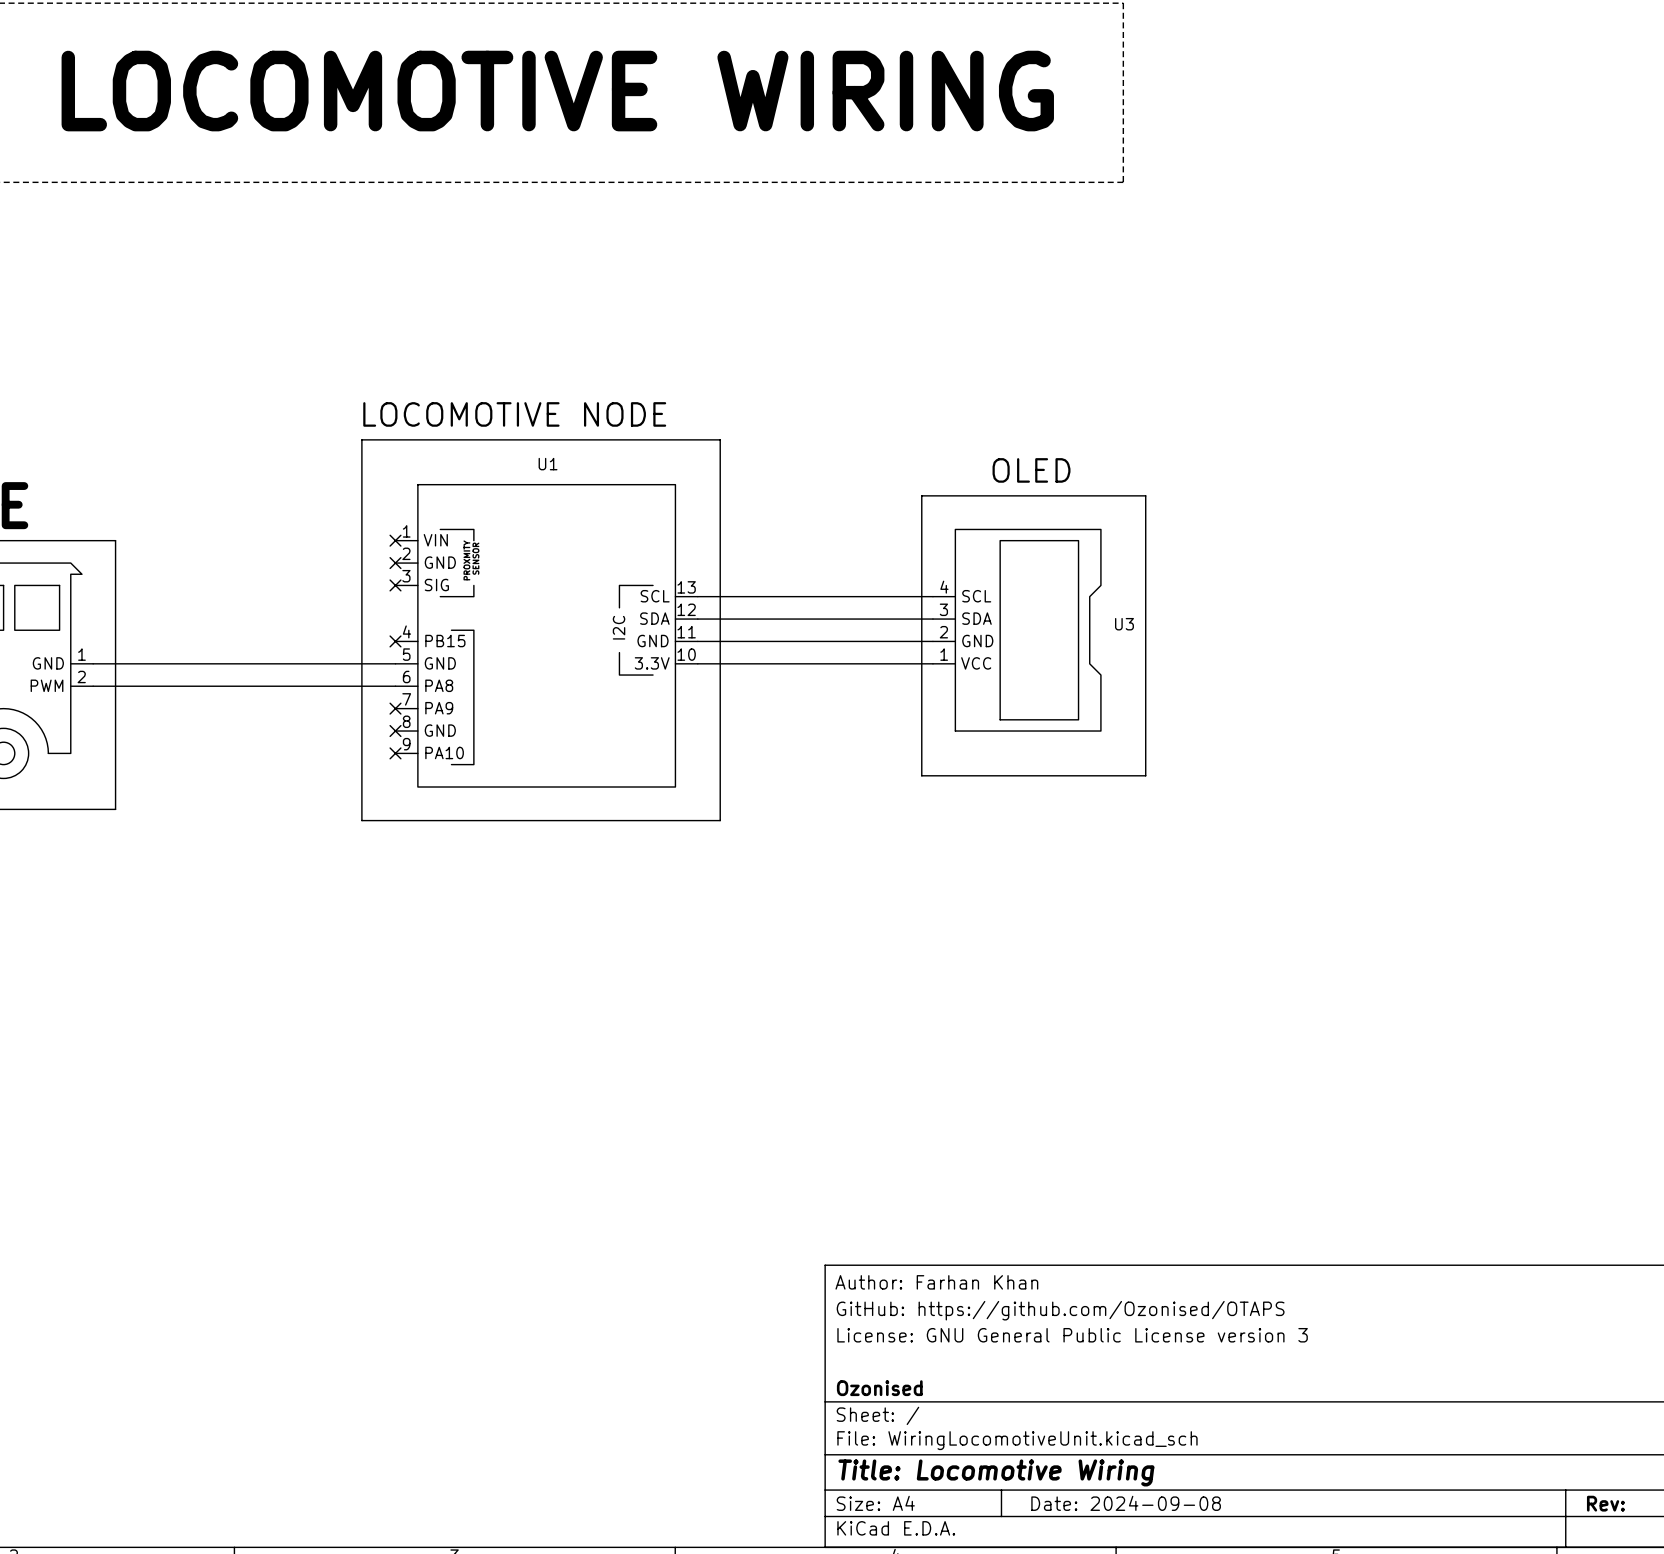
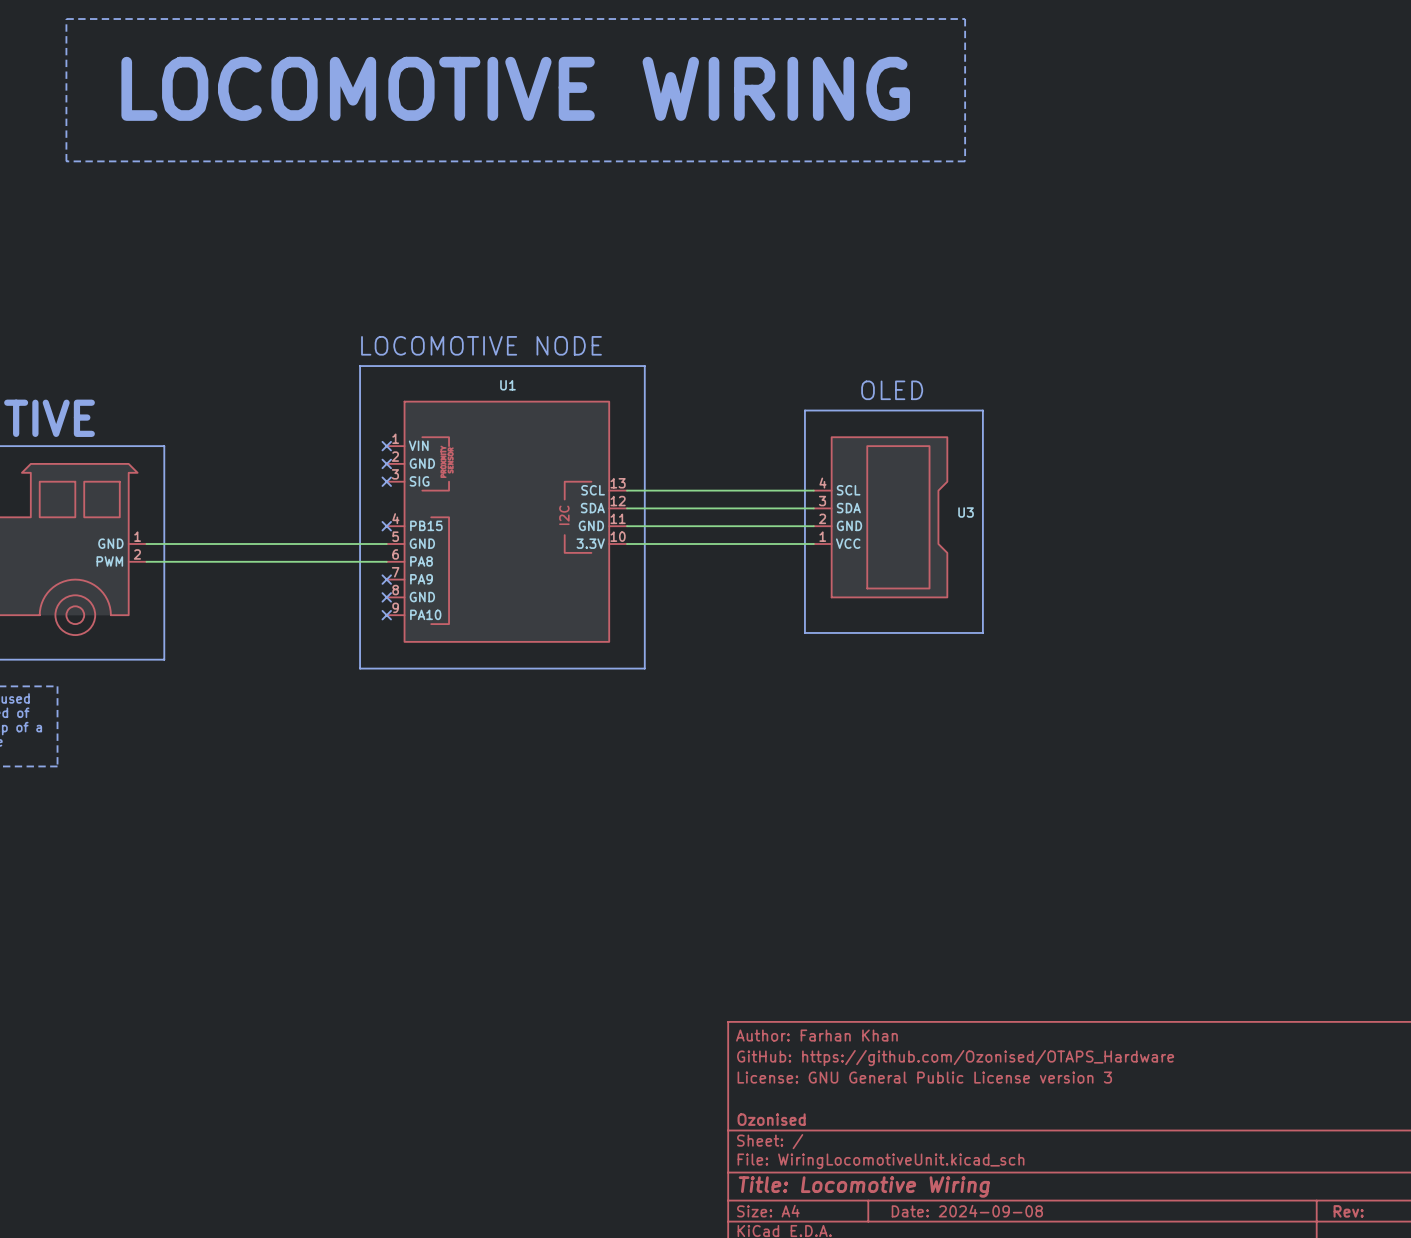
title block: GitHub: https://github.com/Ozonised/OTAPS (1060, 1310) -> GitHub: https://github.com/Ozonised/OTAPS_Hardware (955, 1058)

